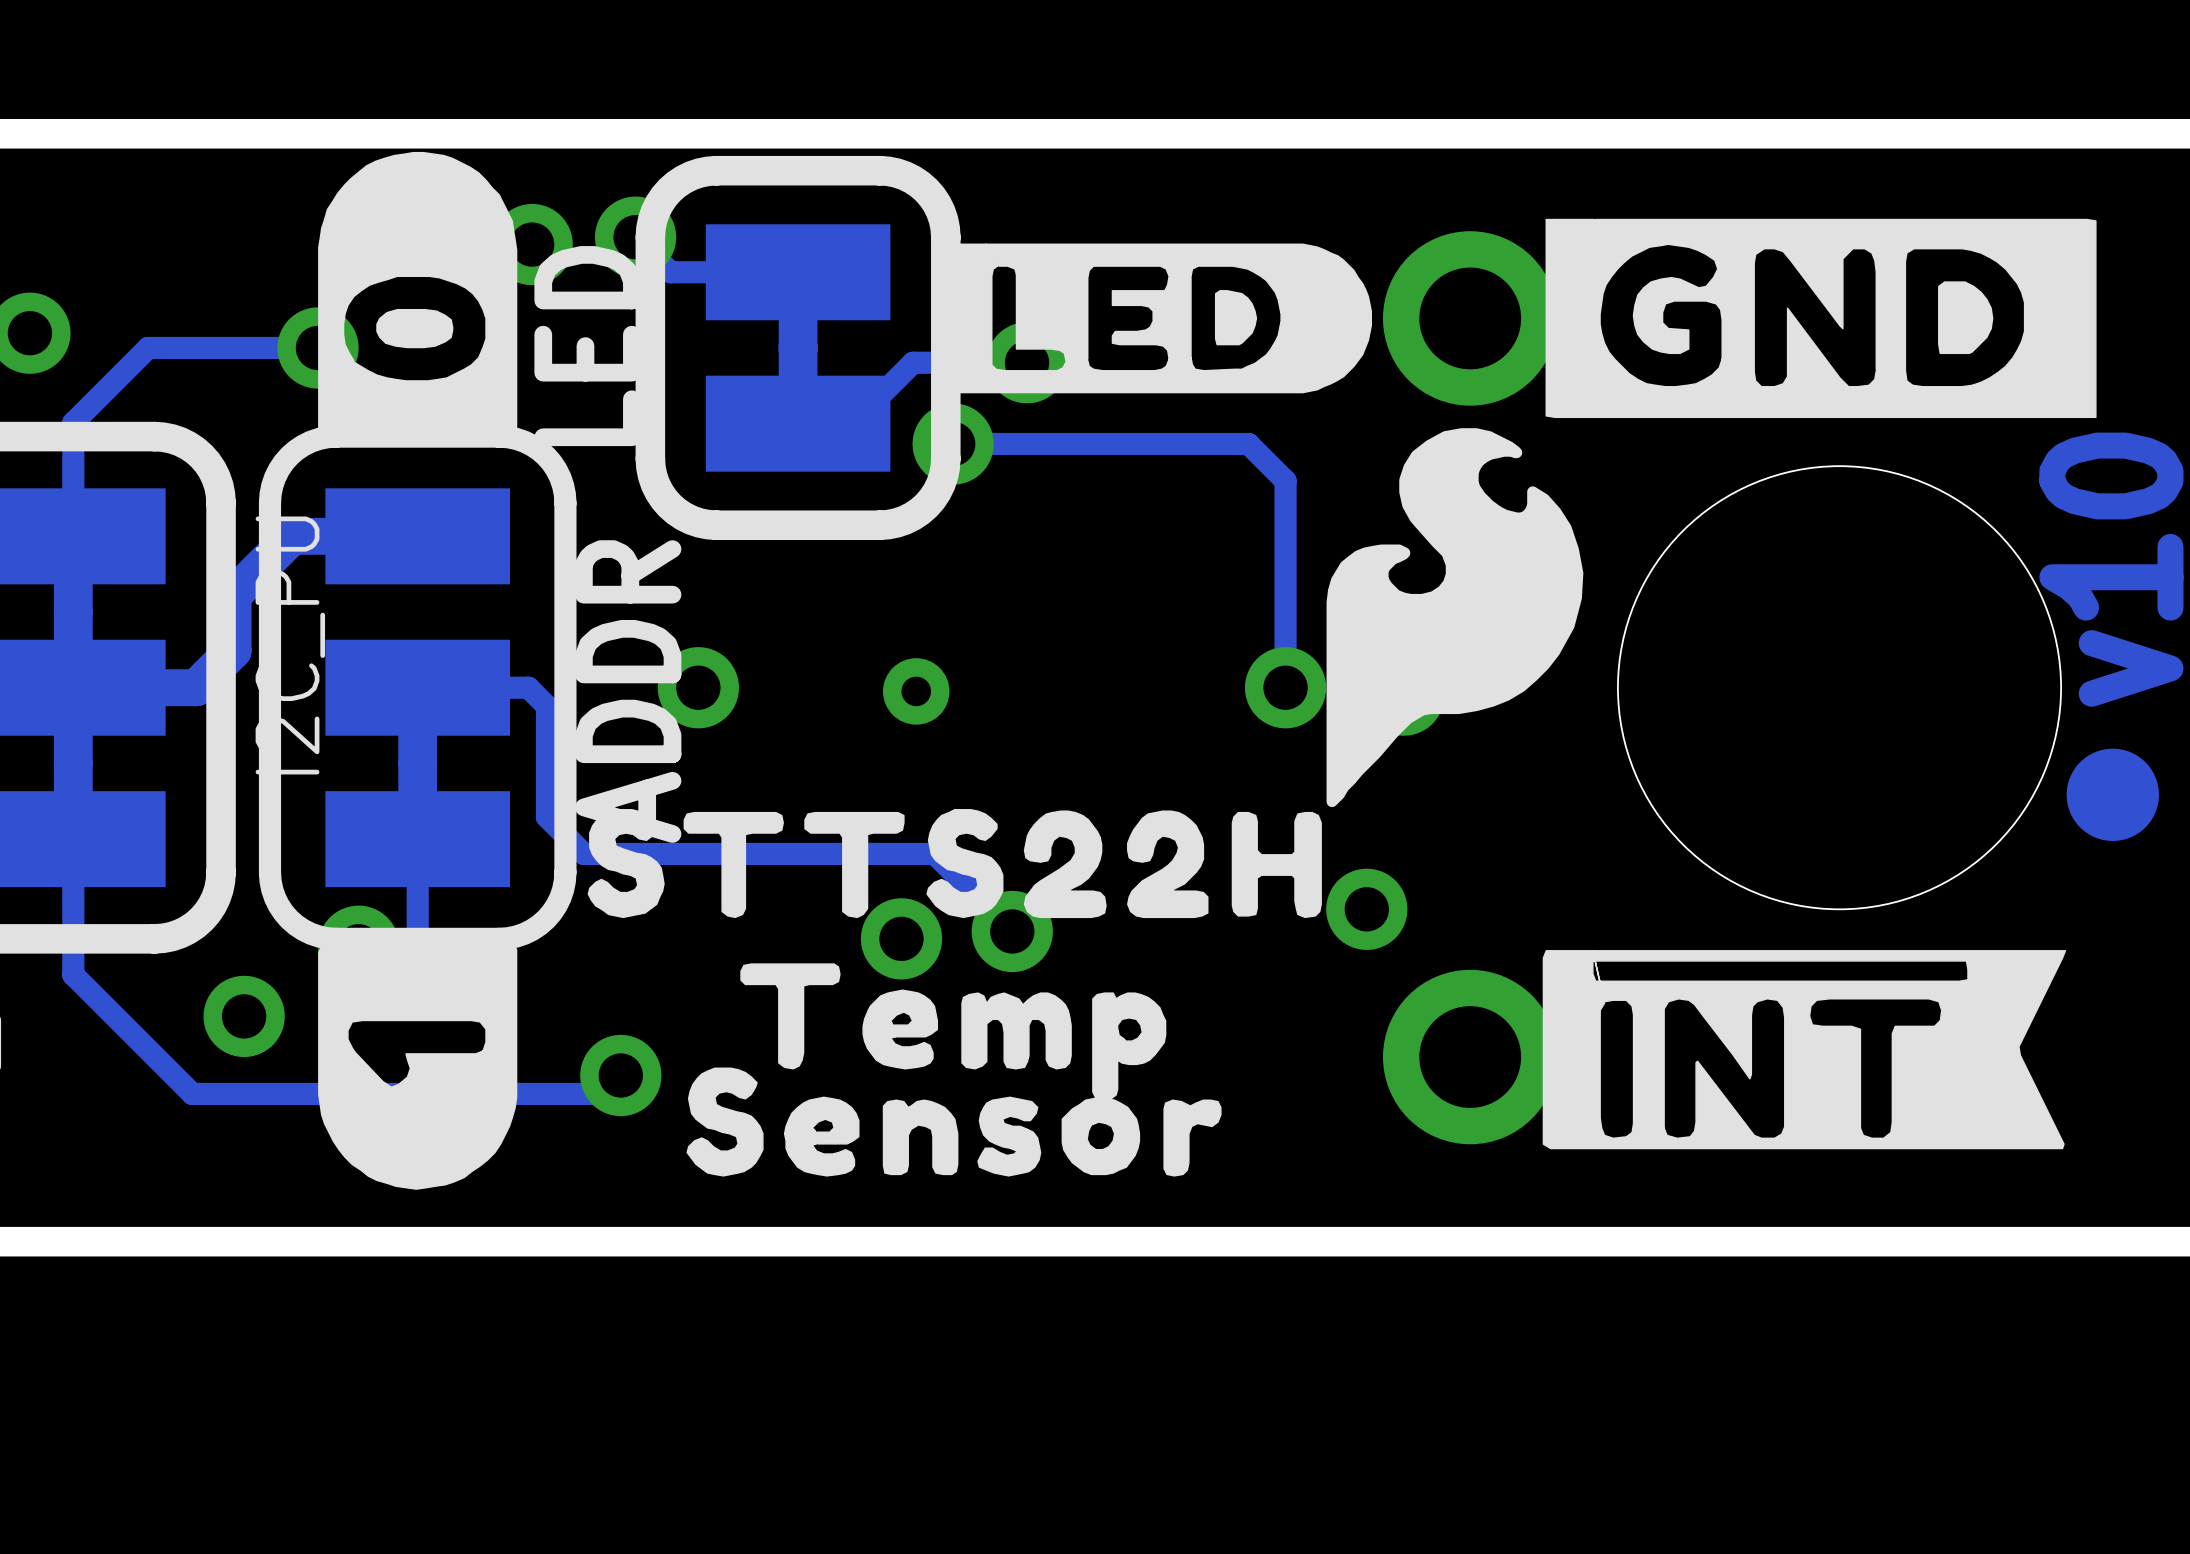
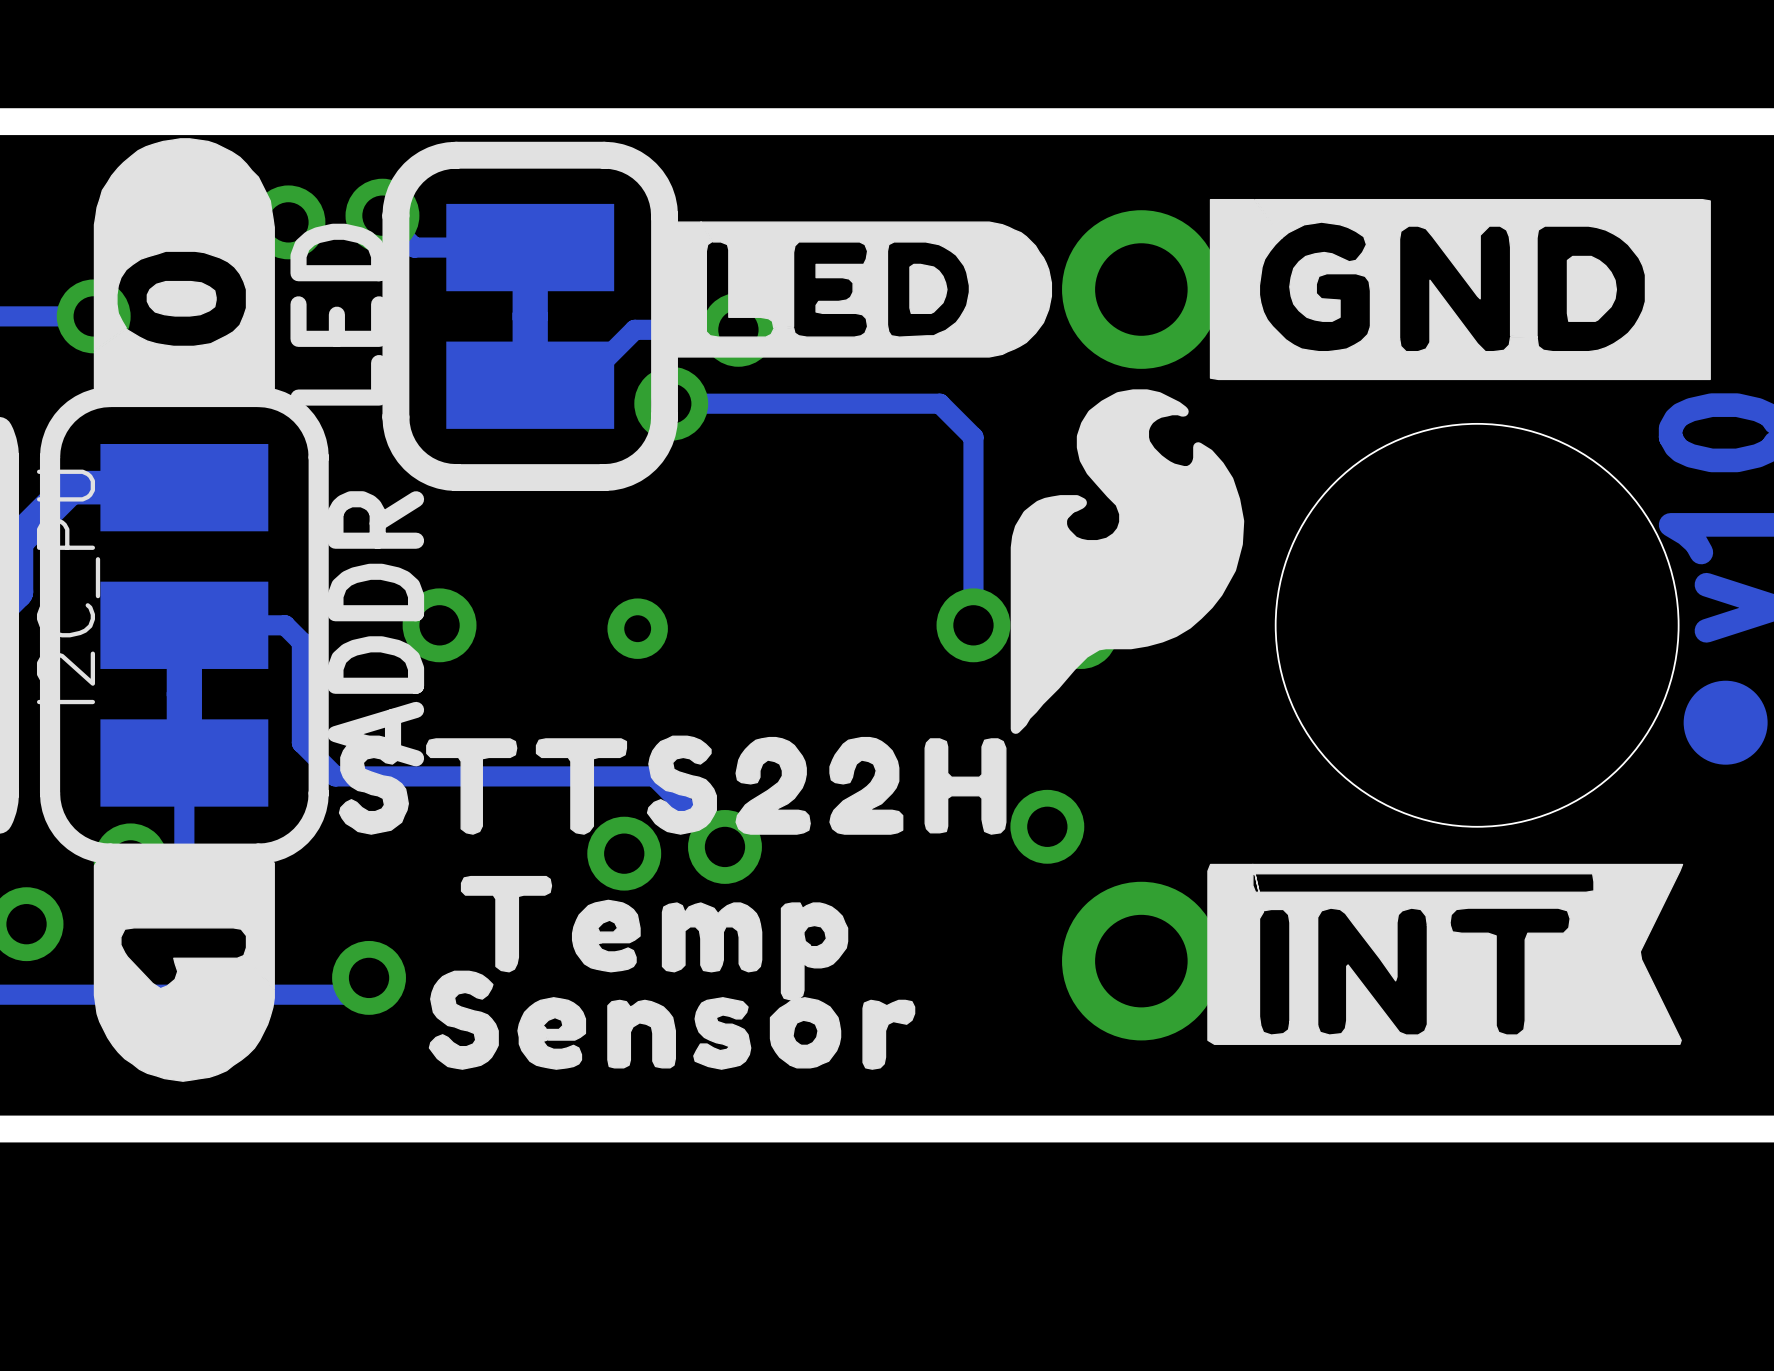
drawing position: (953, 1031) -> (654, 938)

